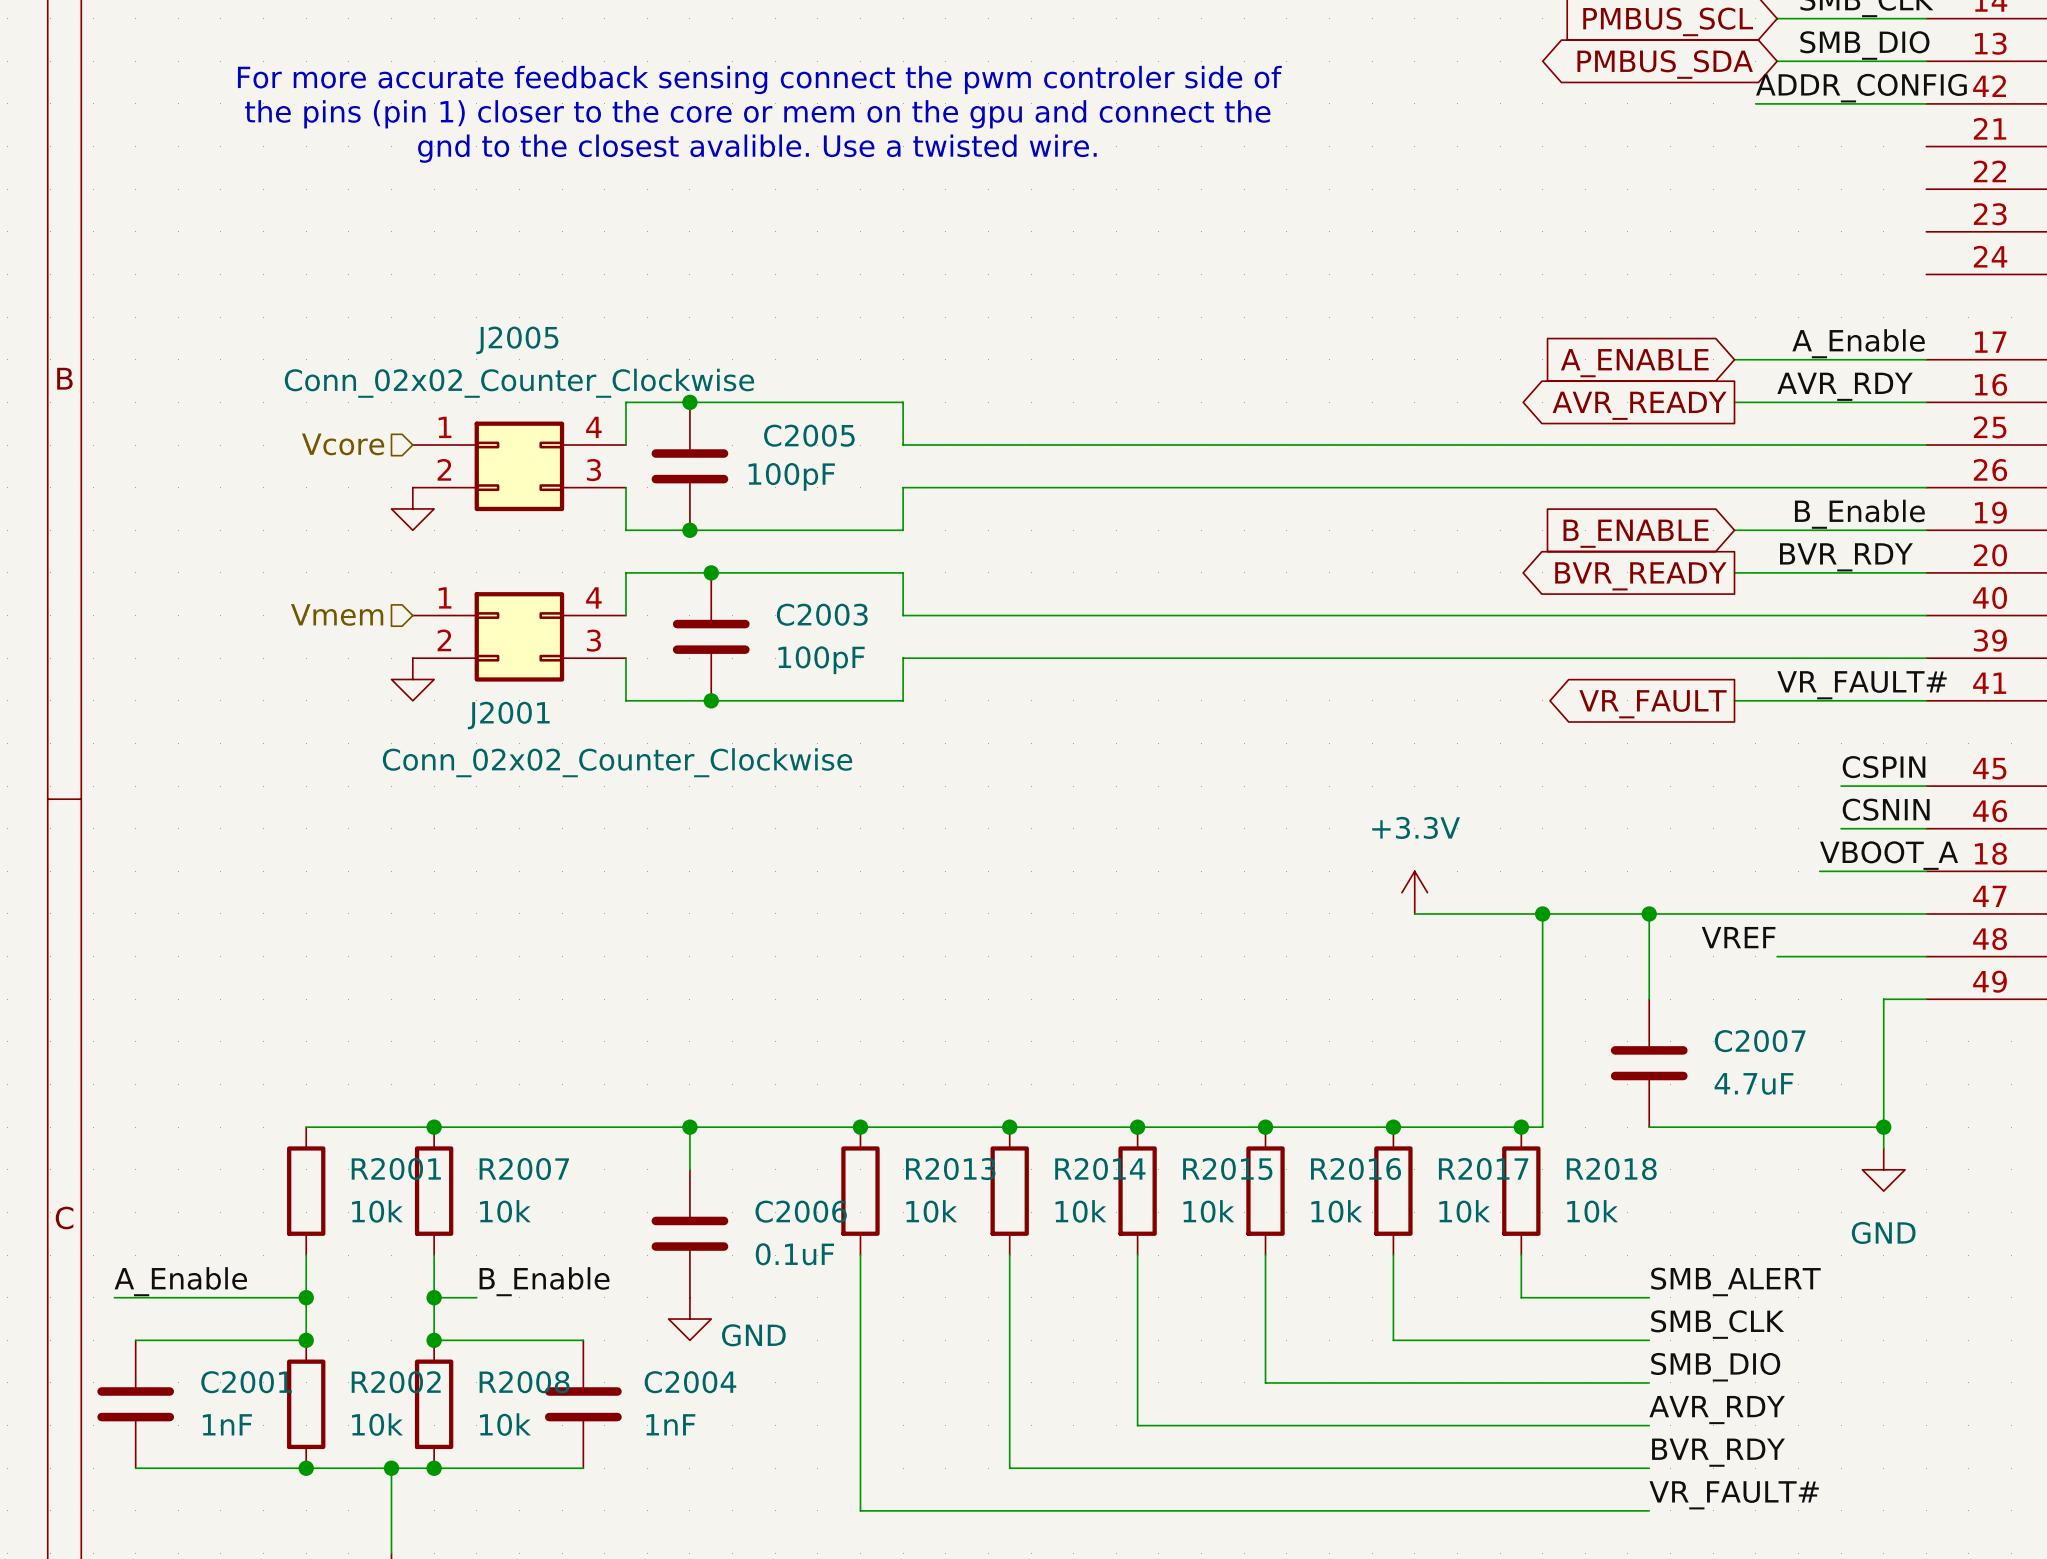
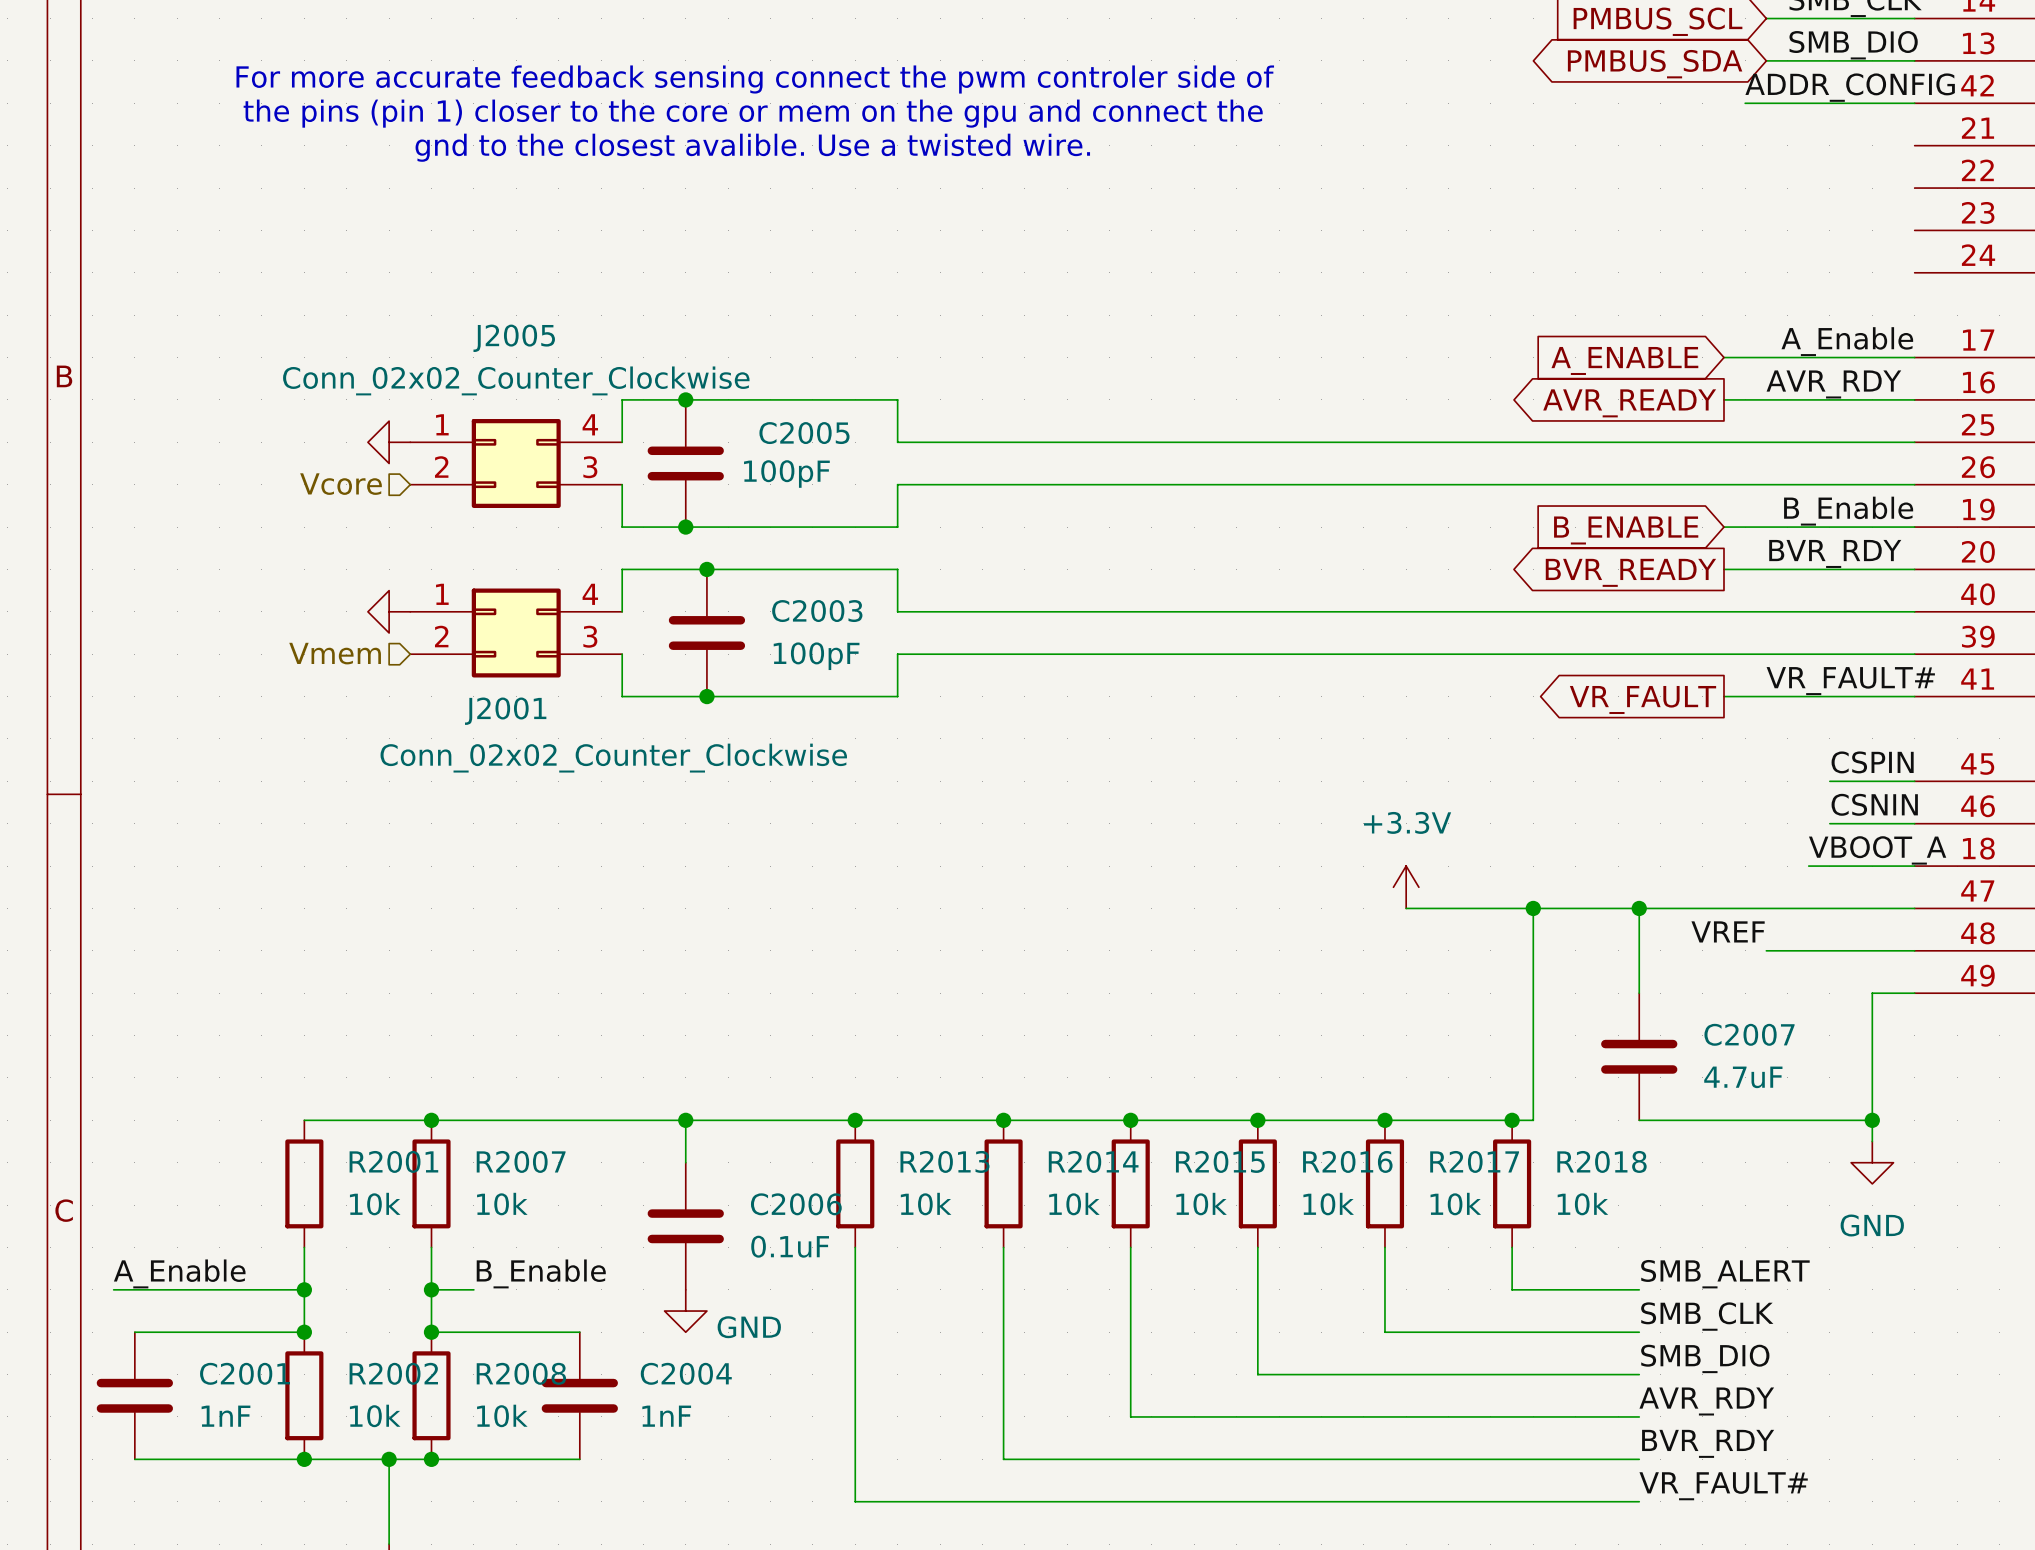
hierarchical label position: Vcore (343, 444) -> Vcore (341, 484)
power symbol: none -> (389, 442)
power symbol: (412, 508) -> none
hierarchical label position: Vmem (337, 614) -> Vmem (335, 653)
power symbol: none -> (389, 611)
power symbol: (412, 679) -> none

